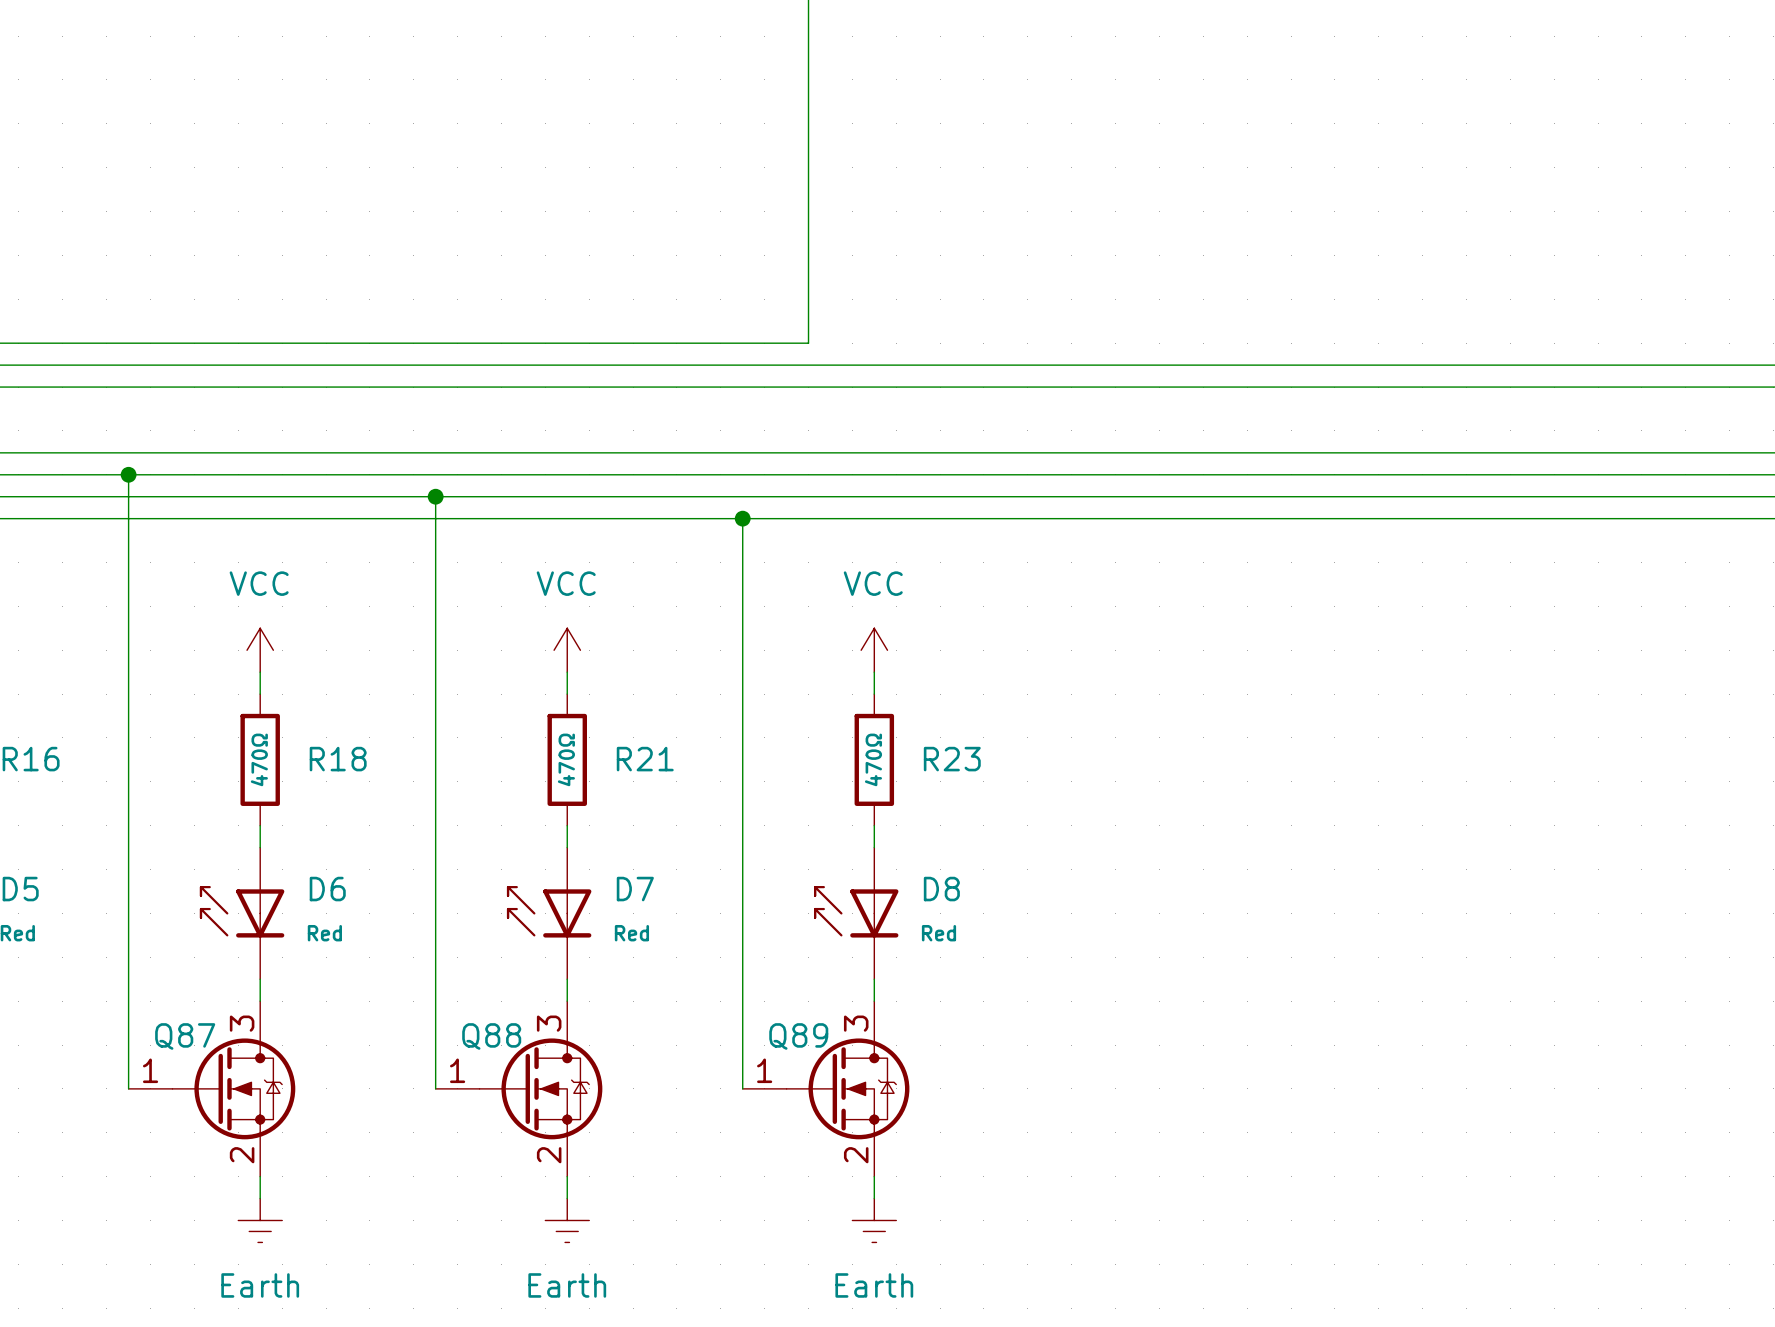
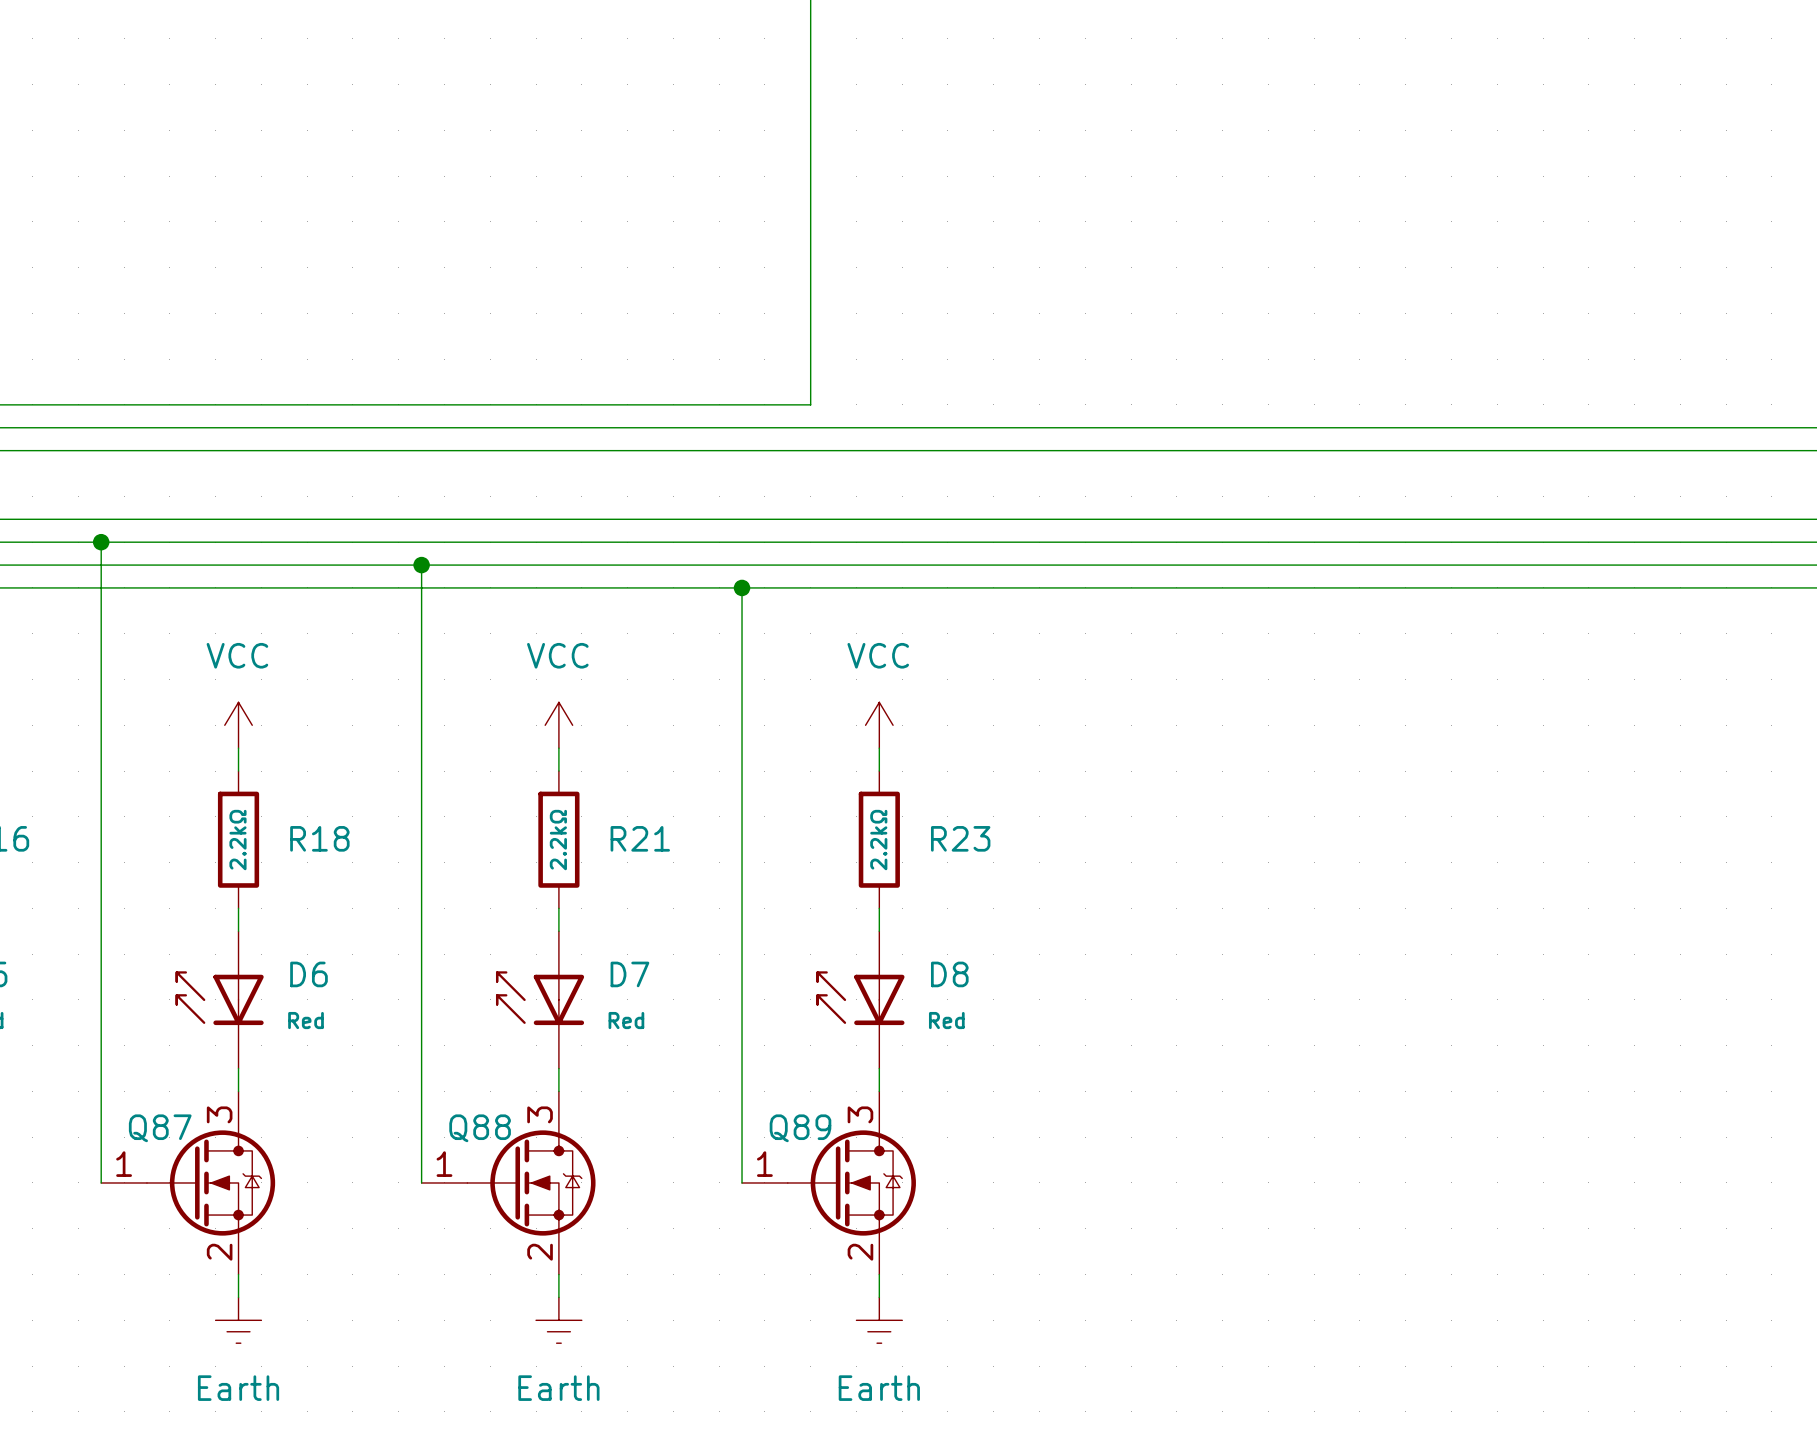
R18 value: 470Ω (259, 759) -> 2.2kΩ (237, 840)
R21 value: 470Ω (566, 759) -> 2.2kΩ (558, 840)
R23 value: 470Ω (873, 759) -> 2.2kΩ (878, 840)

